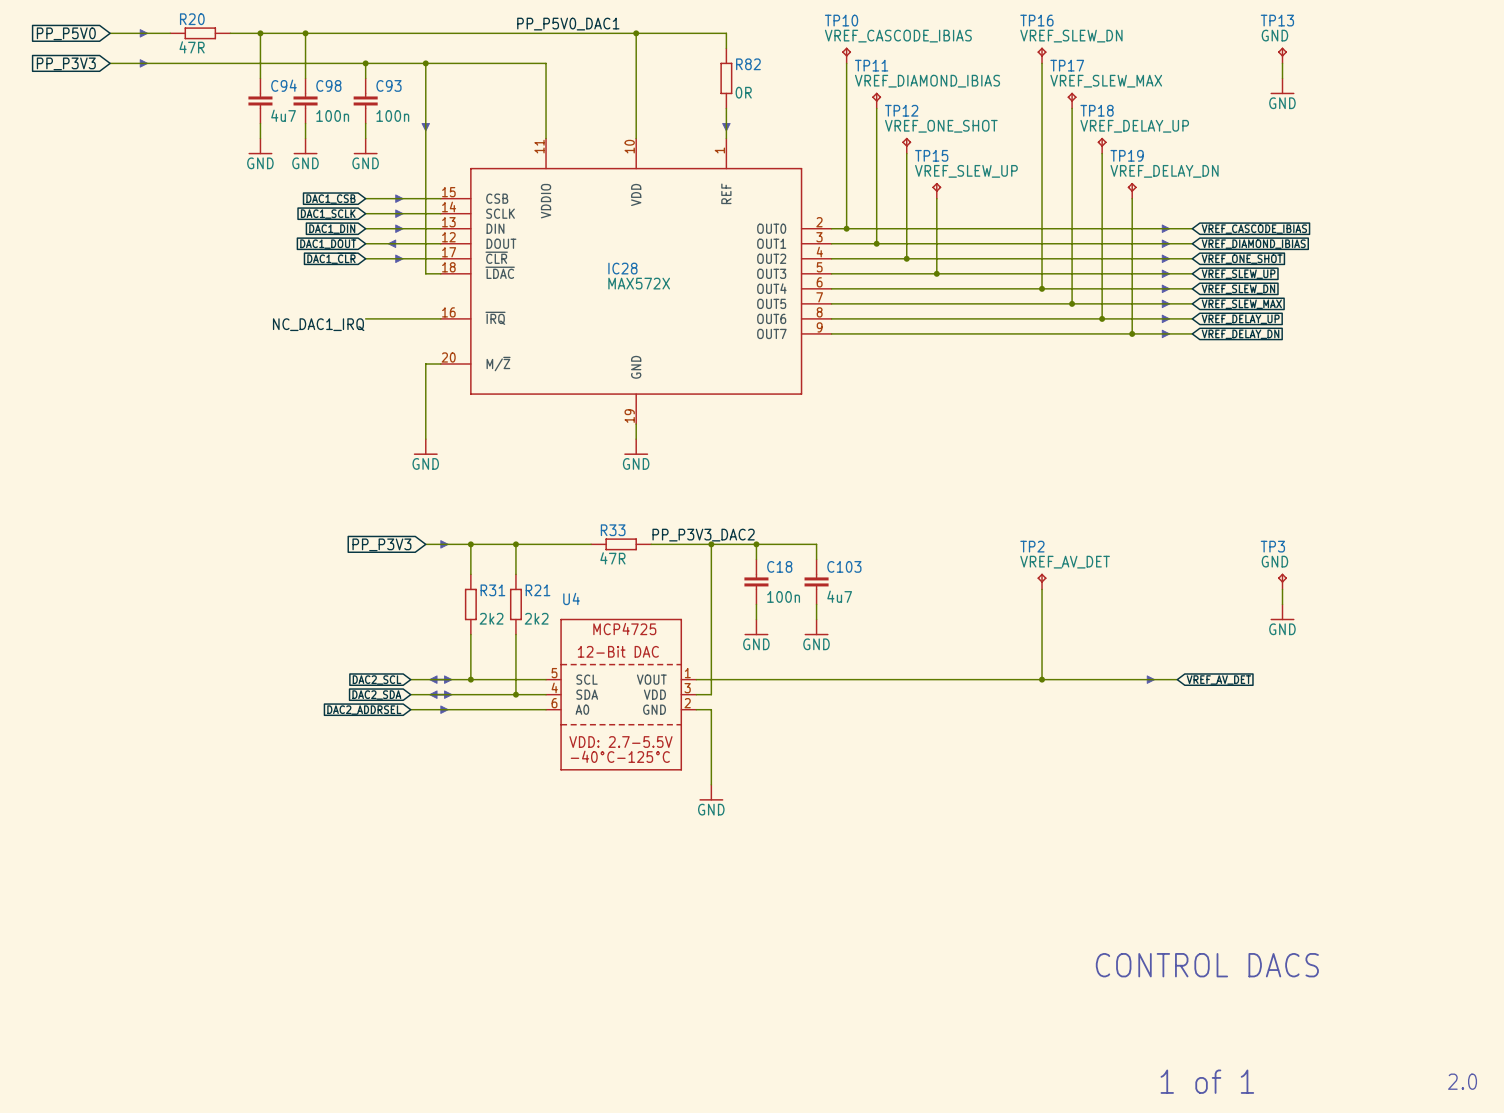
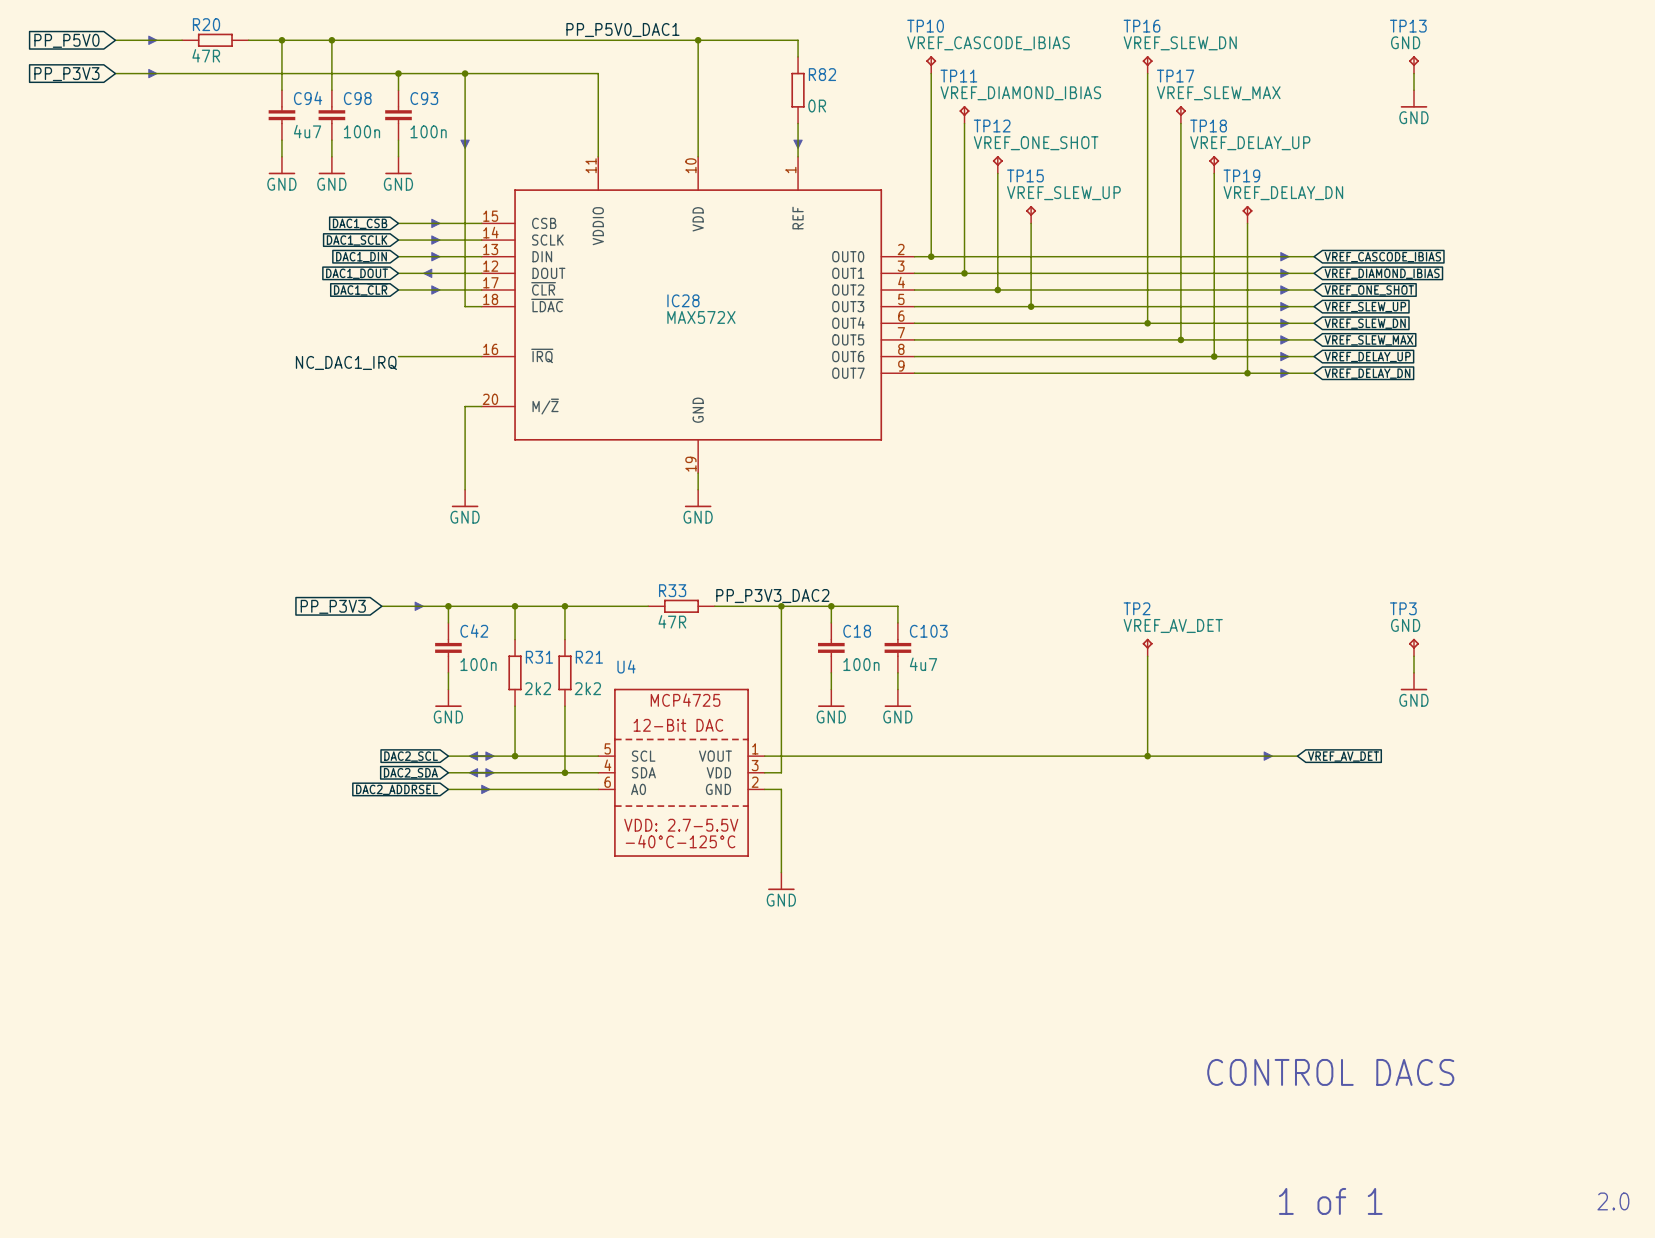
wire: none -> (381, 606) (465, 606)
global label position: PP_P3V3 (381, 544) -> PP_P3V3 (333, 606)
wire: none -> (448, 606) (448, 622)
junction: none -> (448, 606)
part position: (444, 544) -> (419, 606)
C42: none -> 100n (448, 647)
wire: none -> (448, 672) (448, 689)
power symbol: none -> GND (448, 698)

